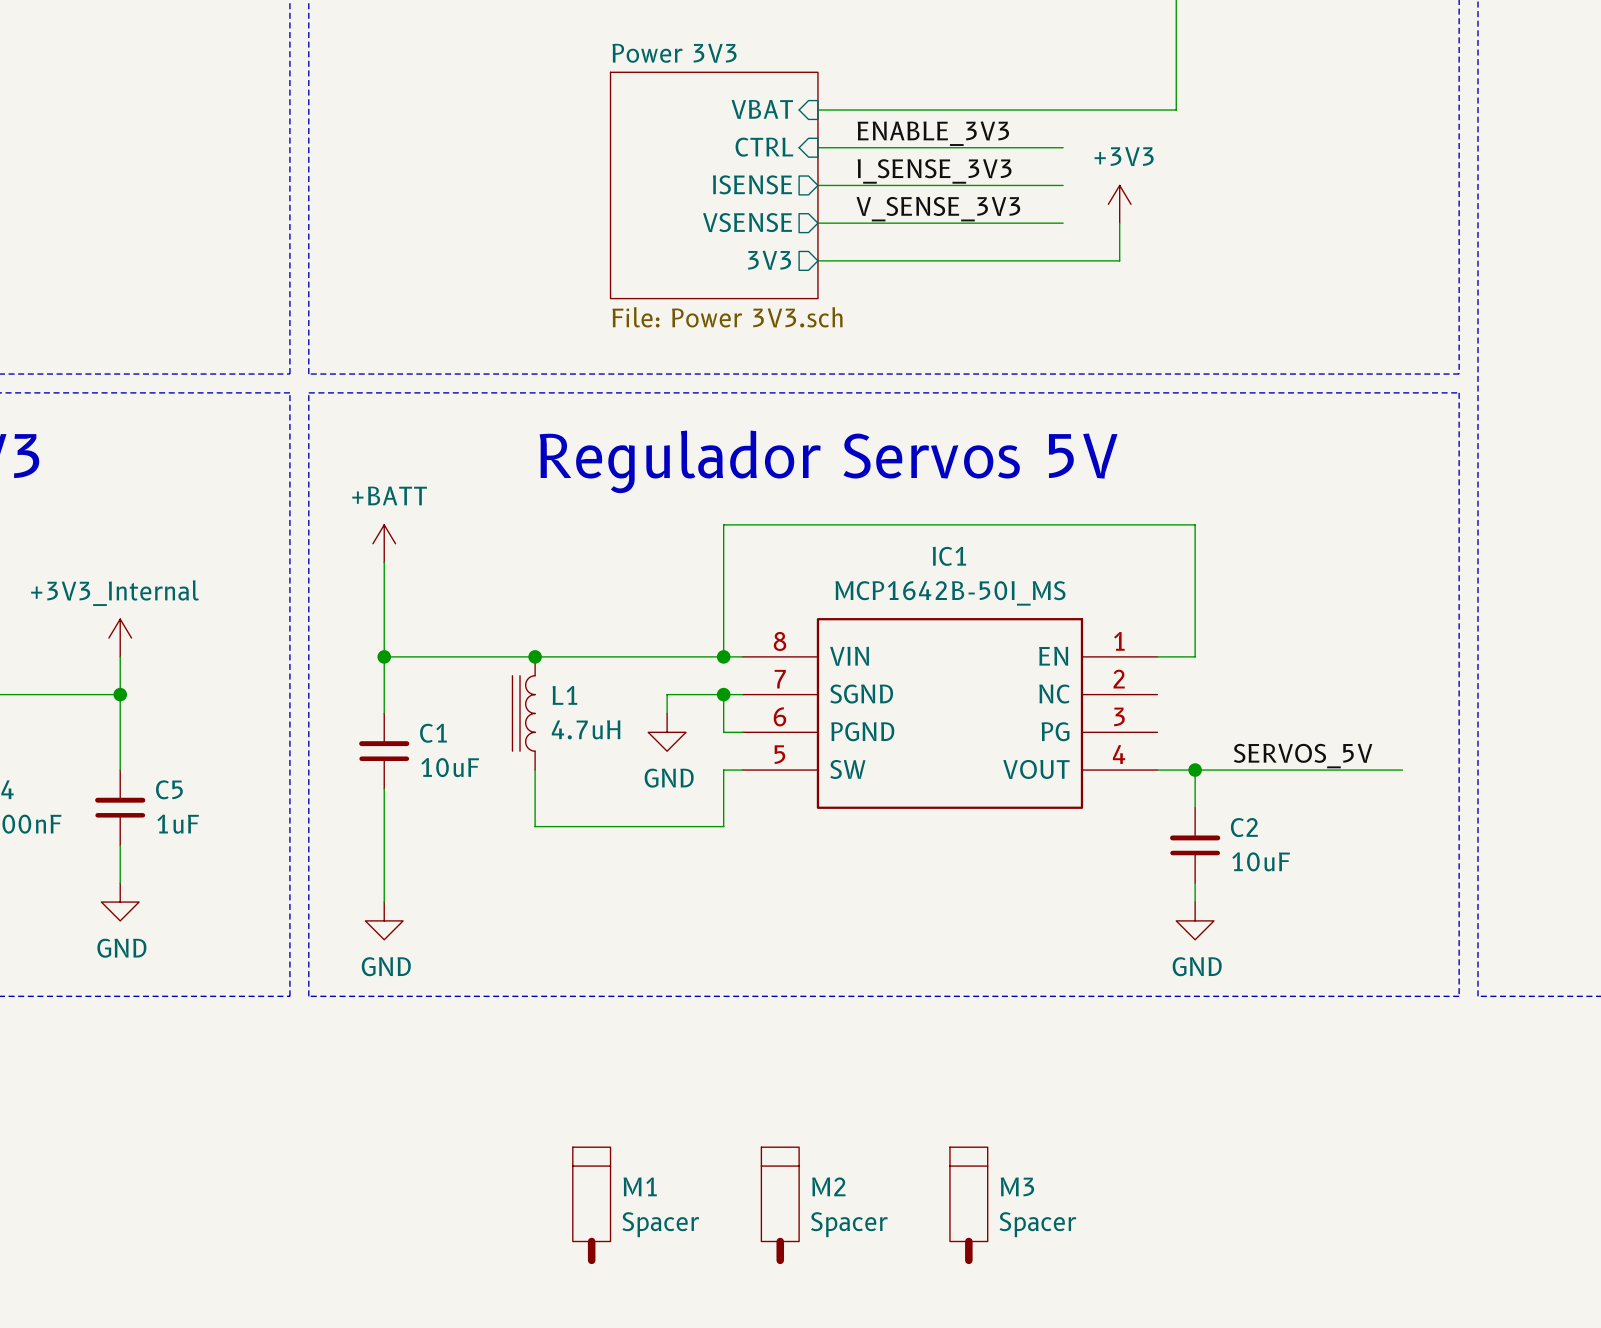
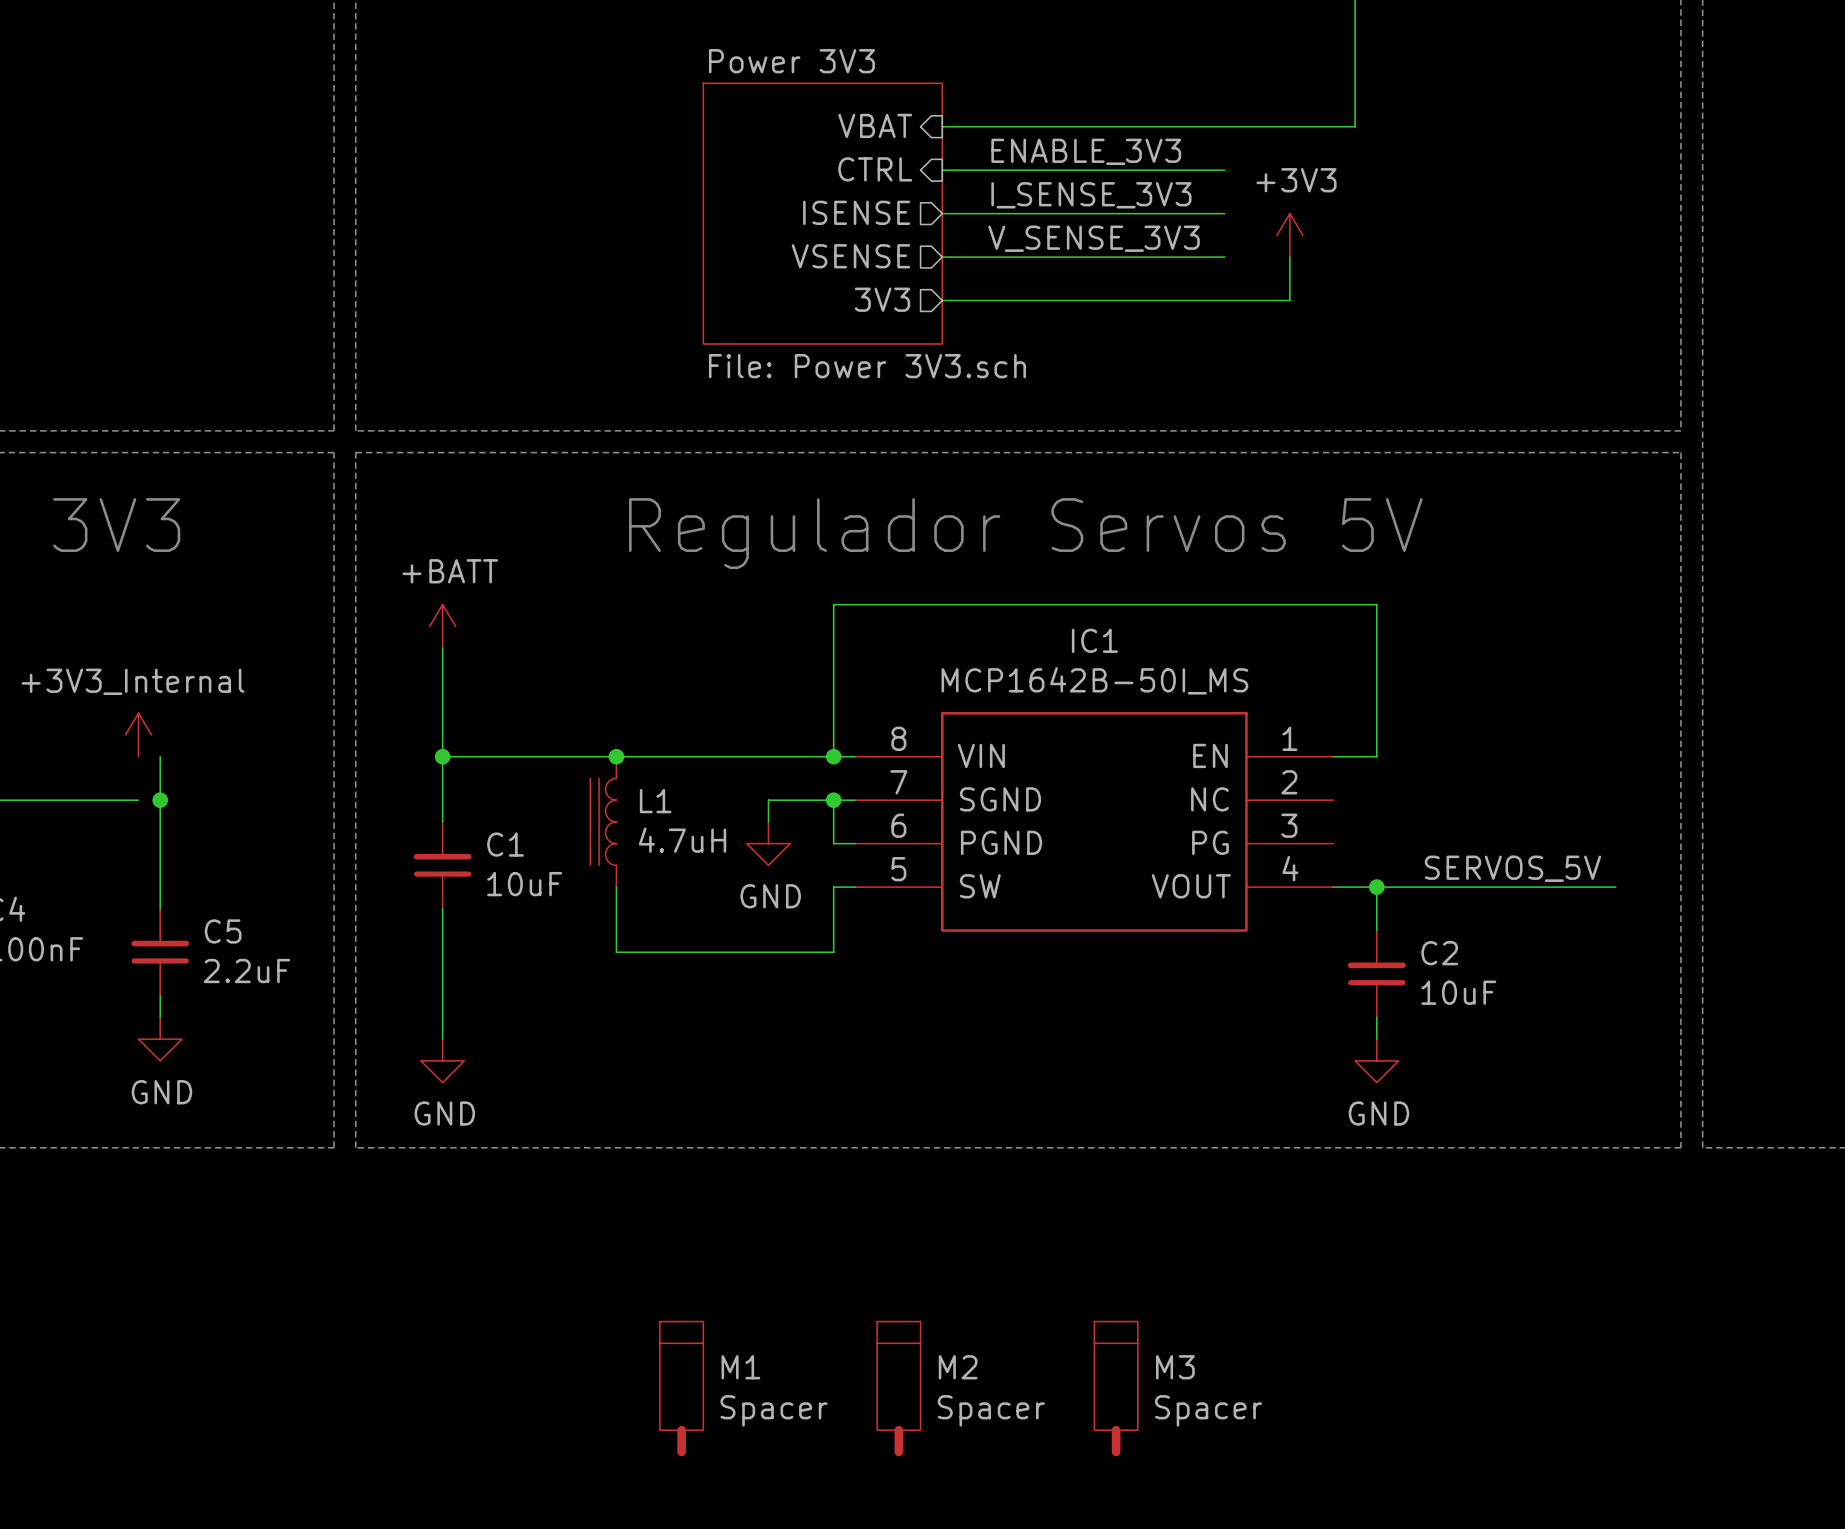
wire: (120, 656) (120, 770) -> none
wire: none -> (160, 756) (160, 908)
junction position: (120, 694) -> (160, 800)
C5 position: (120, 807) -> (160, 952)
C5 value: 1uF (178, 824) -> 2.2uF (246, 971)
wire: (120, 845) (120, 883) -> none
wire: none -> (160, 995) (160, 1017)
power symbol position: GND (120, 902) -> GND (160, 1039)

